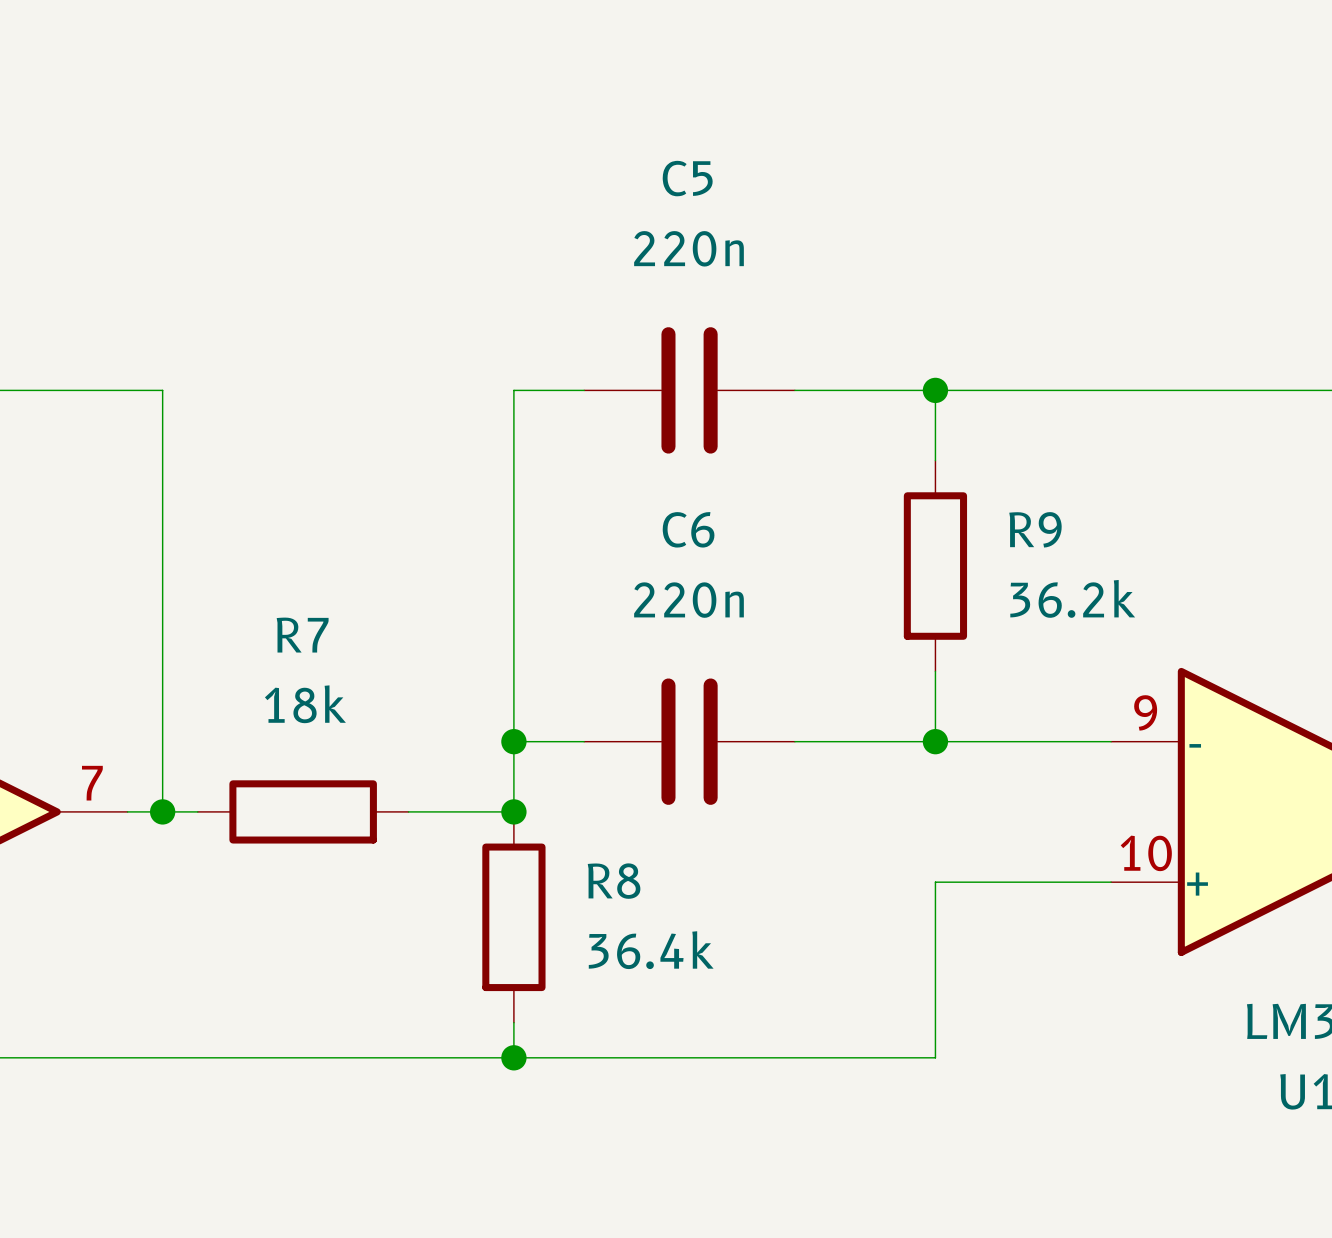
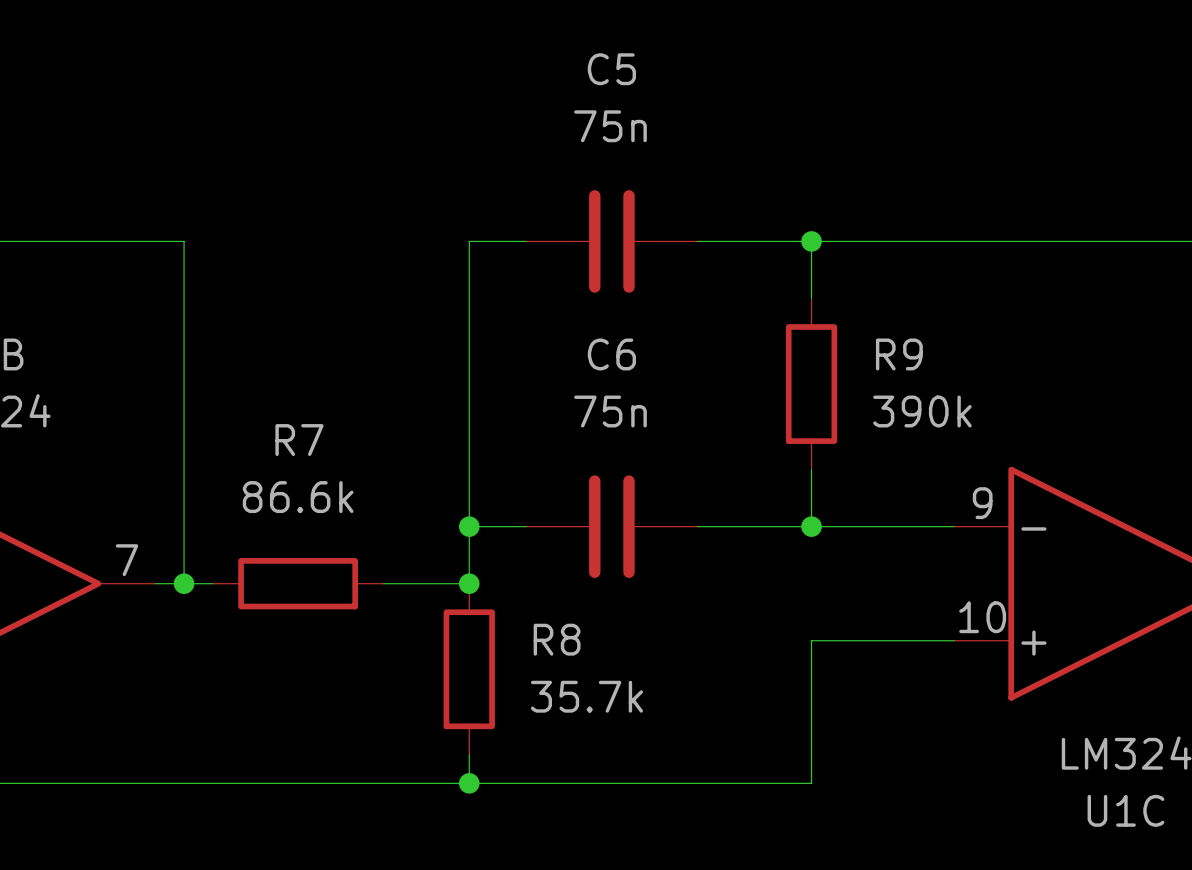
C5 value: 220n (688, 248) -> 75n (610, 126)
R9 value: 36.2k (1072, 598) -> 390k (922, 411)
C6 value: 220n (688, 600) -> 75n (610, 411)
R7 value: 18k (305, 704) -> 86.6k (298, 497)
R8 value: 36.4k (651, 950) -> 35.7k (586, 696)

